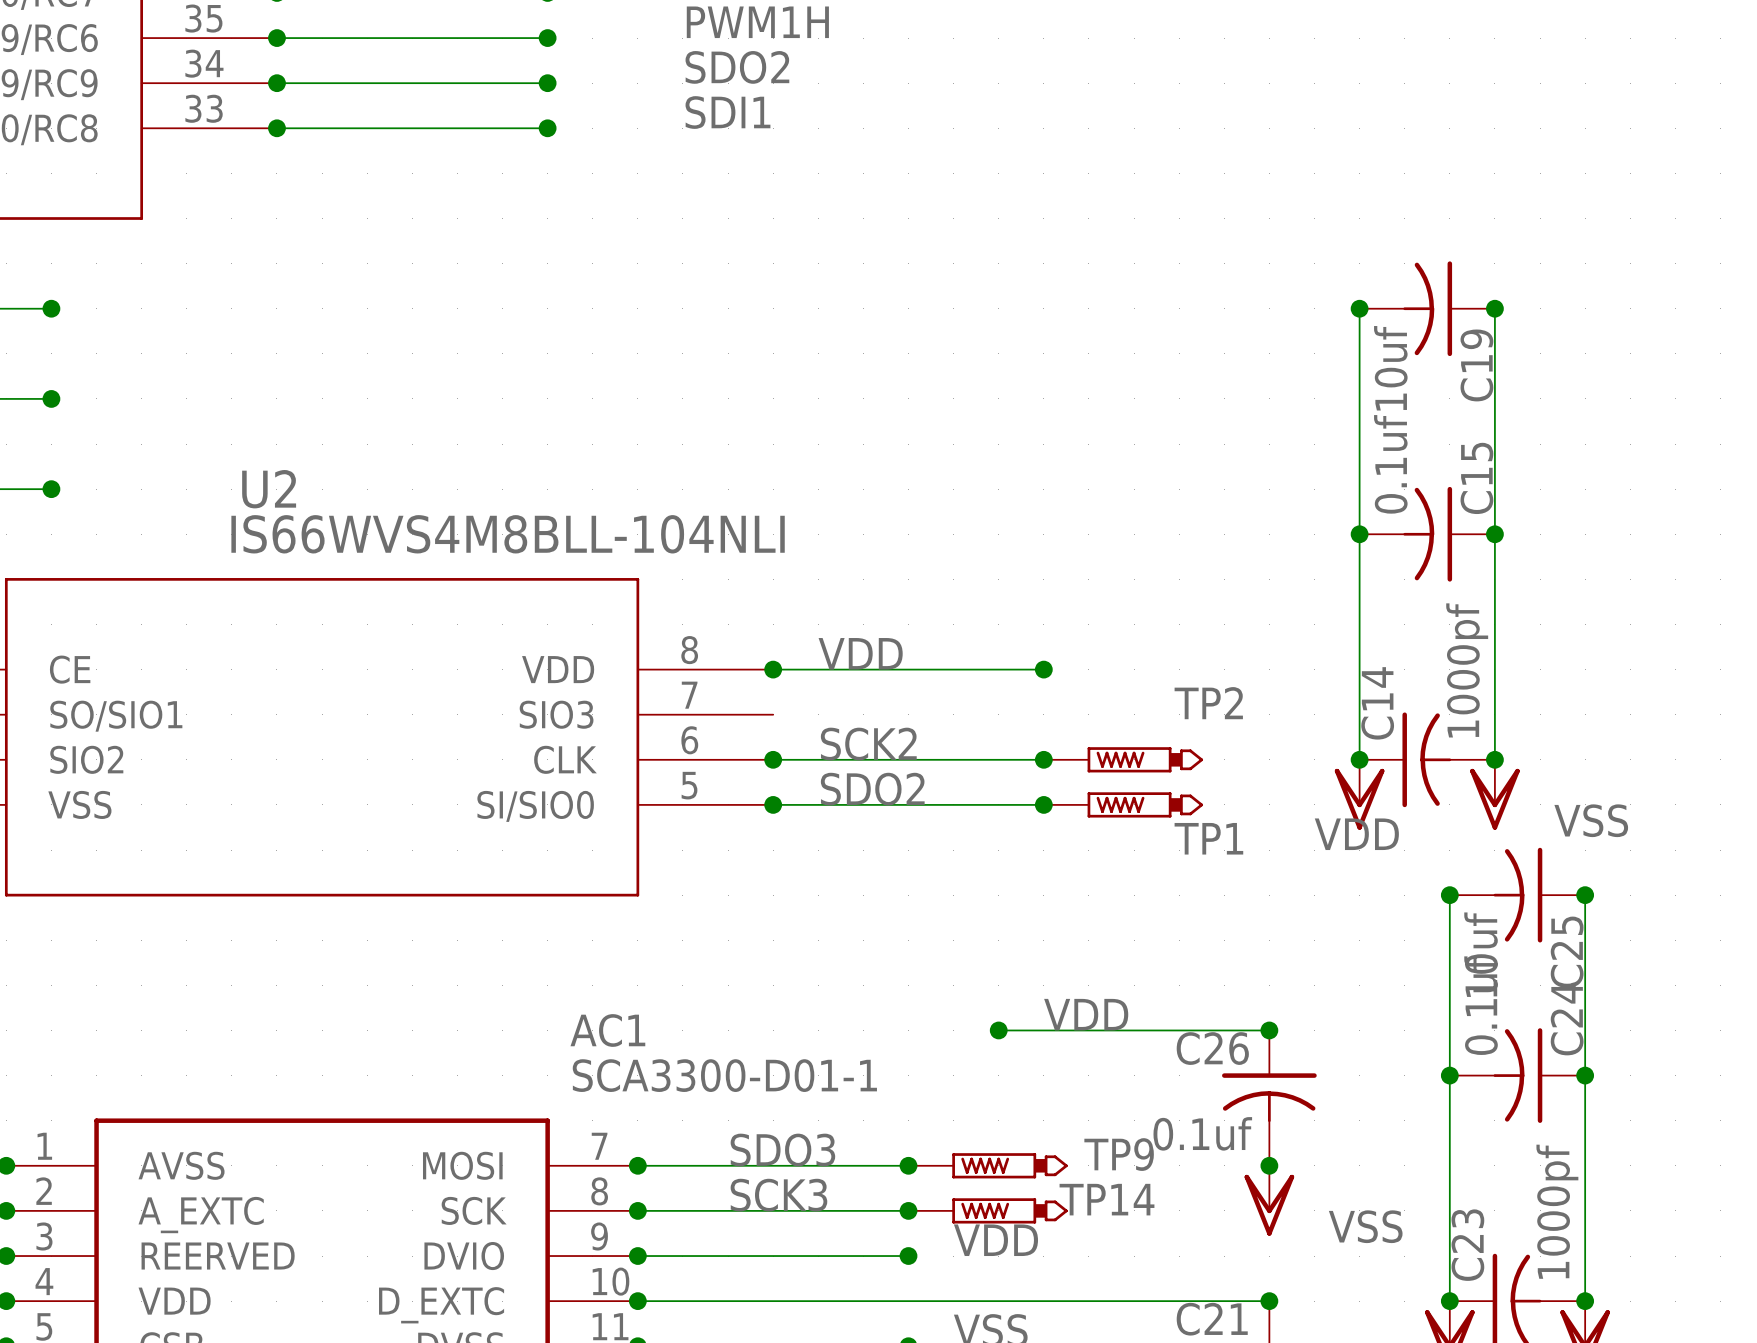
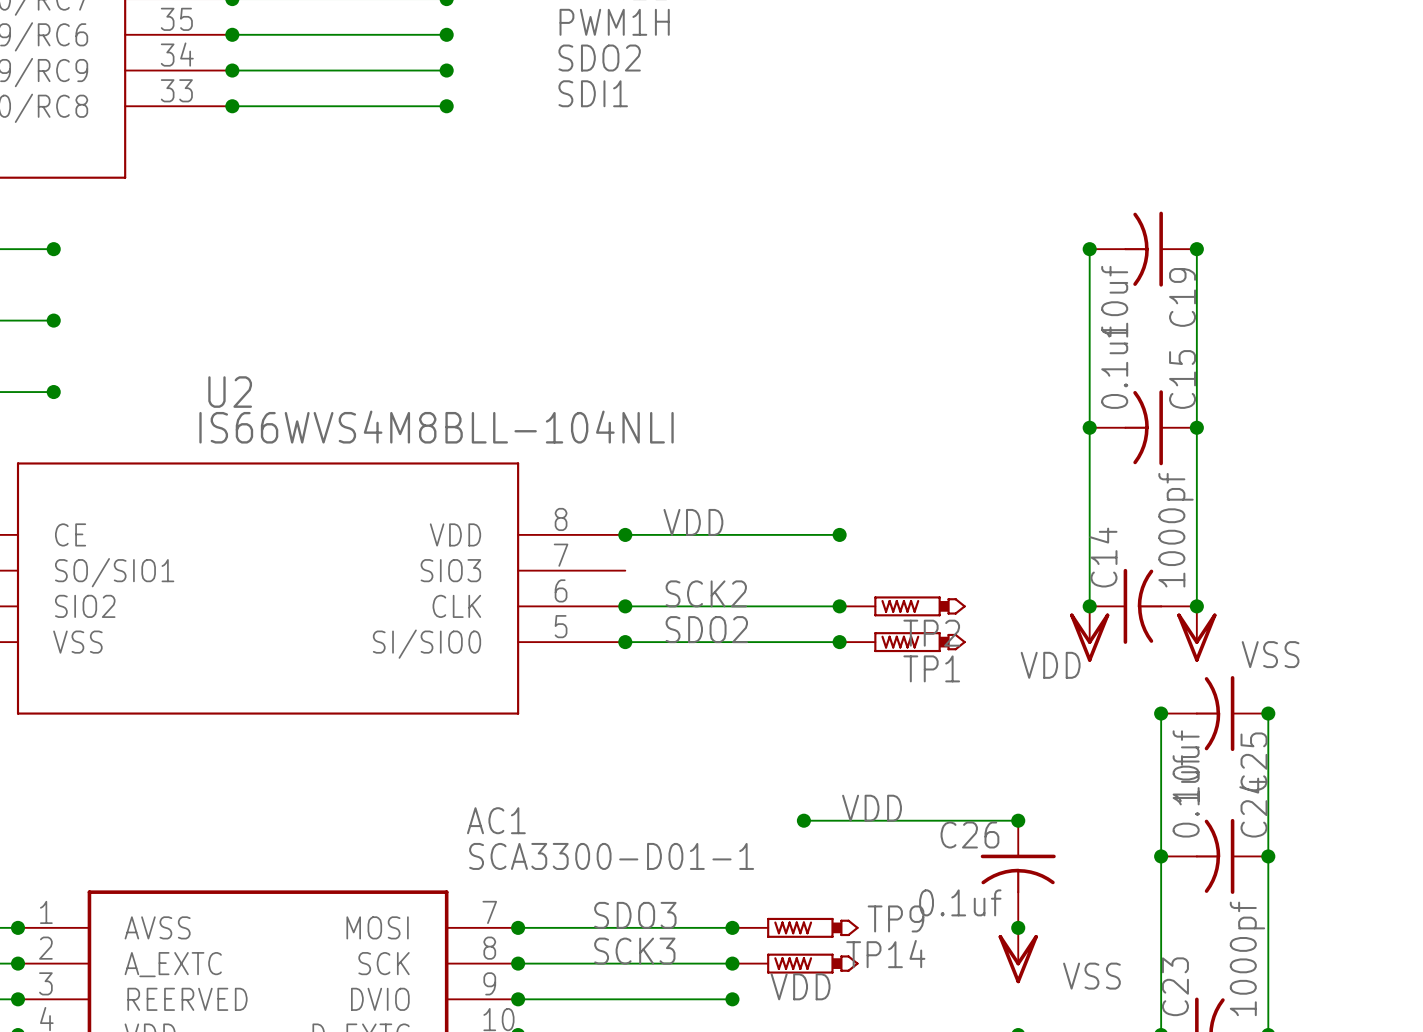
TP2 name position: TP2 (1208, 703) -> TP2 (931, 633)
power symbol text position: VDD (1356, 834) -> VDD (1050, 665)
TP1 name position: TP1 (1208, 838) -> TP1 (931, 668)

